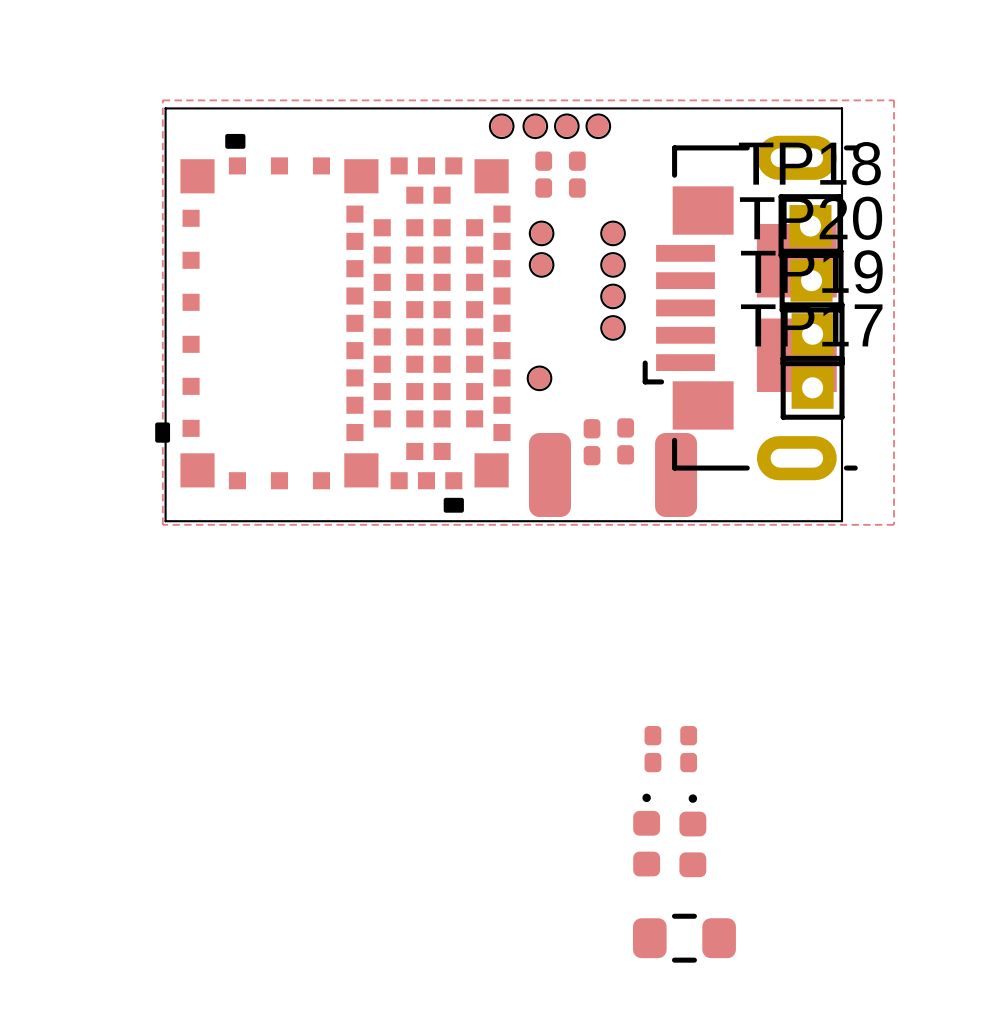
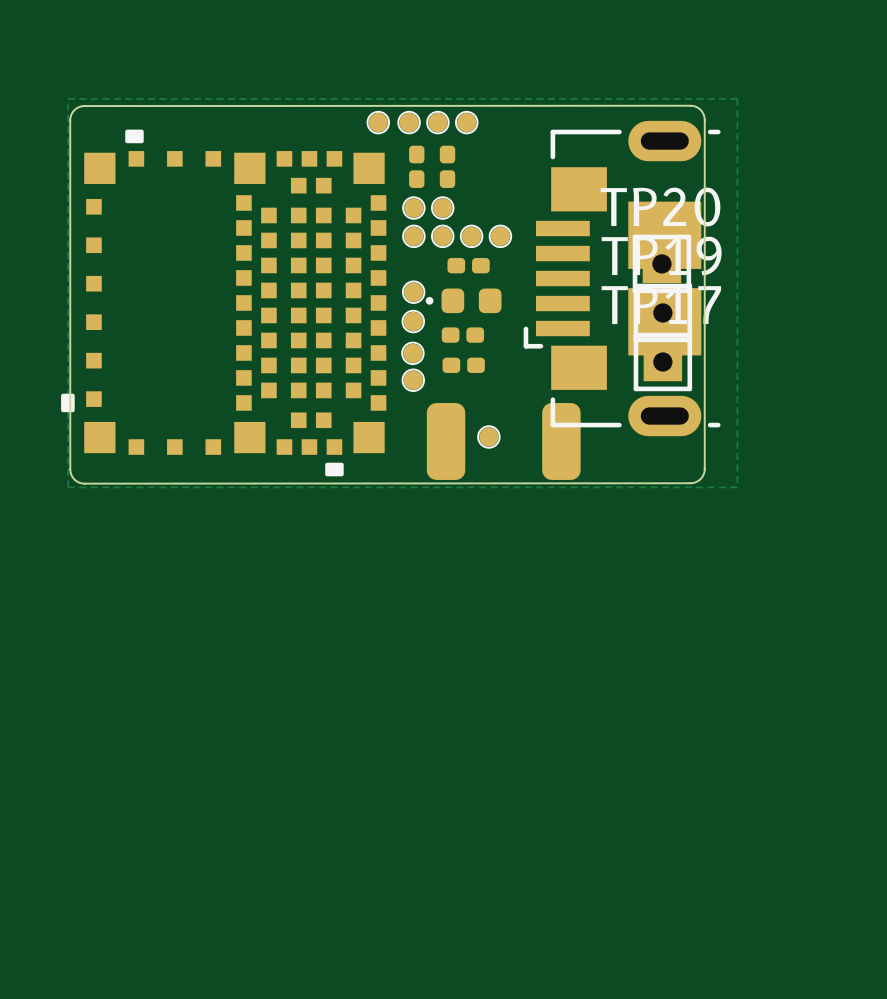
board edge: (165, 108) (842, 108) (842, 521) (165, 521) (165, 108) -> (690, 105) (84, 106) (76, 108) (71, 114) (70, 120) (70, 469) (72, 476) (76, 481) (84, 483) (690, 483) (698, 481) (703, 475) (704, 469) (704, 119) (700, 109) (690, 105)
part: none -> (413, 208)
part: none -> (442, 208)
TP18: (810, 226) -> none
part: (541, 233) -> none
part: (613, 233) -> none
part: none -> (413, 236)
part: none -> (442, 236)
part: none -> (471, 236)
part: none -> (500, 236)
part: (541, 264) -> none
part: (613, 264) -> none
part: none -> (468, 265)
part: (613, 296) -> none
part position: (750, 307) -> (622, 278)
part: none -> (413, 292)
part: none -> (463, 300)
part: (613, 327) -> none
part: none -> (413, 321)
part: none -> (462, 335)
part: none -> (463, 365)
part: none -> (413, 380)
part footprint: [529, 432, 698, 518] -> [477, 425, 501, 449]
part: (625, 441) -> none
part: (592, 442) -> none
part: none -> (503, 441)
part: (652, 749) -> none
part: (688, 749) -> none
part: (646, 835) -> none
part: (692, 835) -> none
part: (684, 938) -> none

